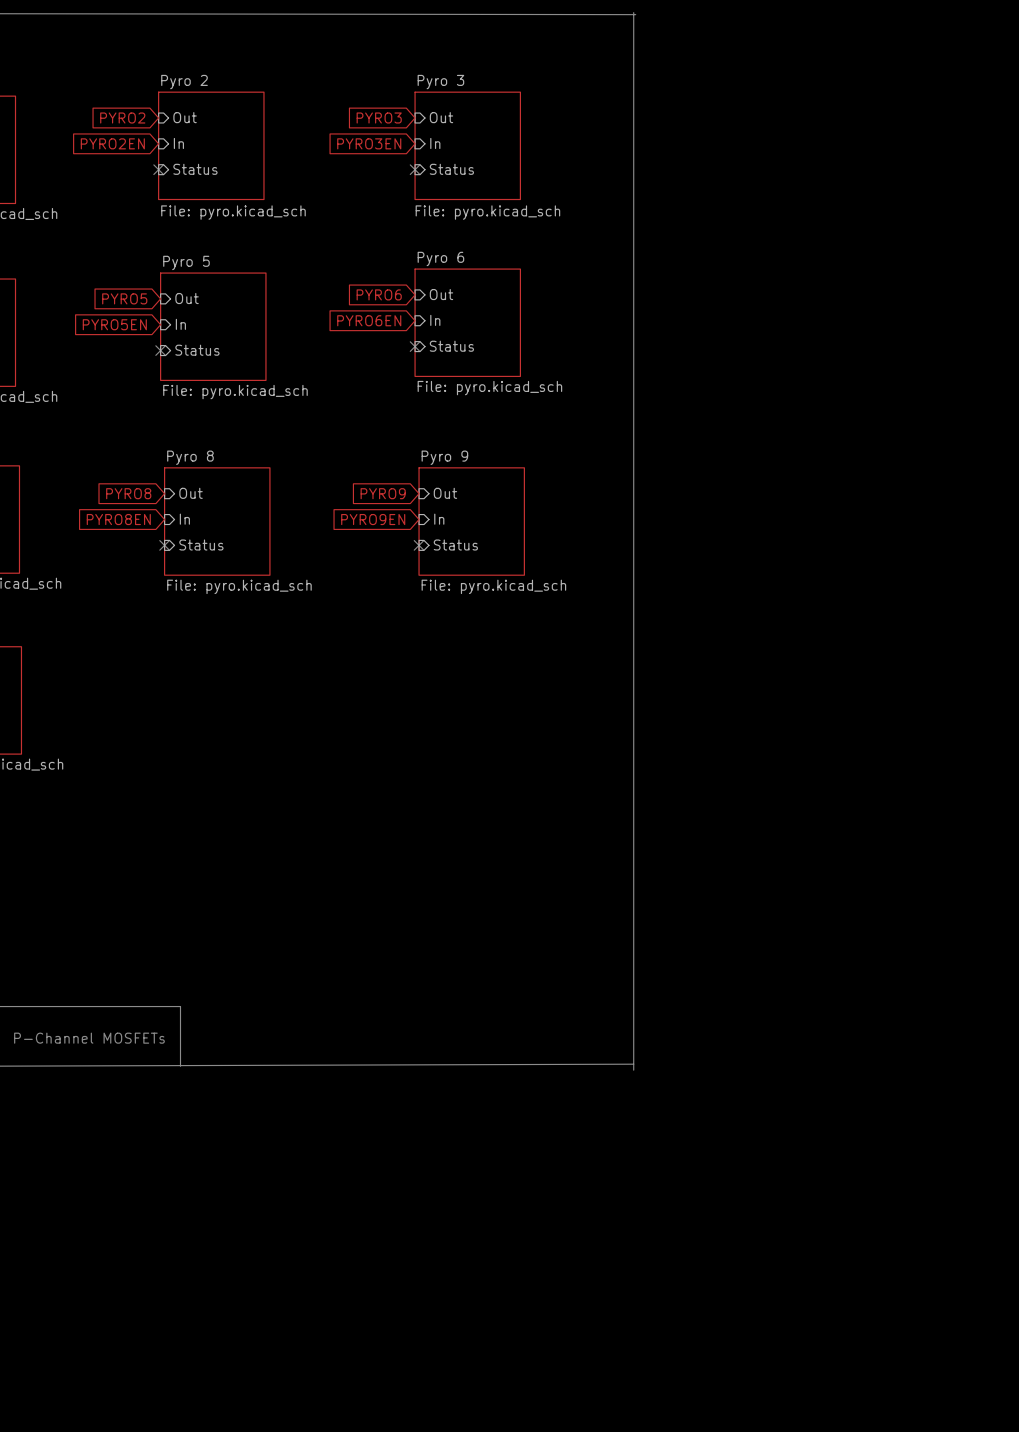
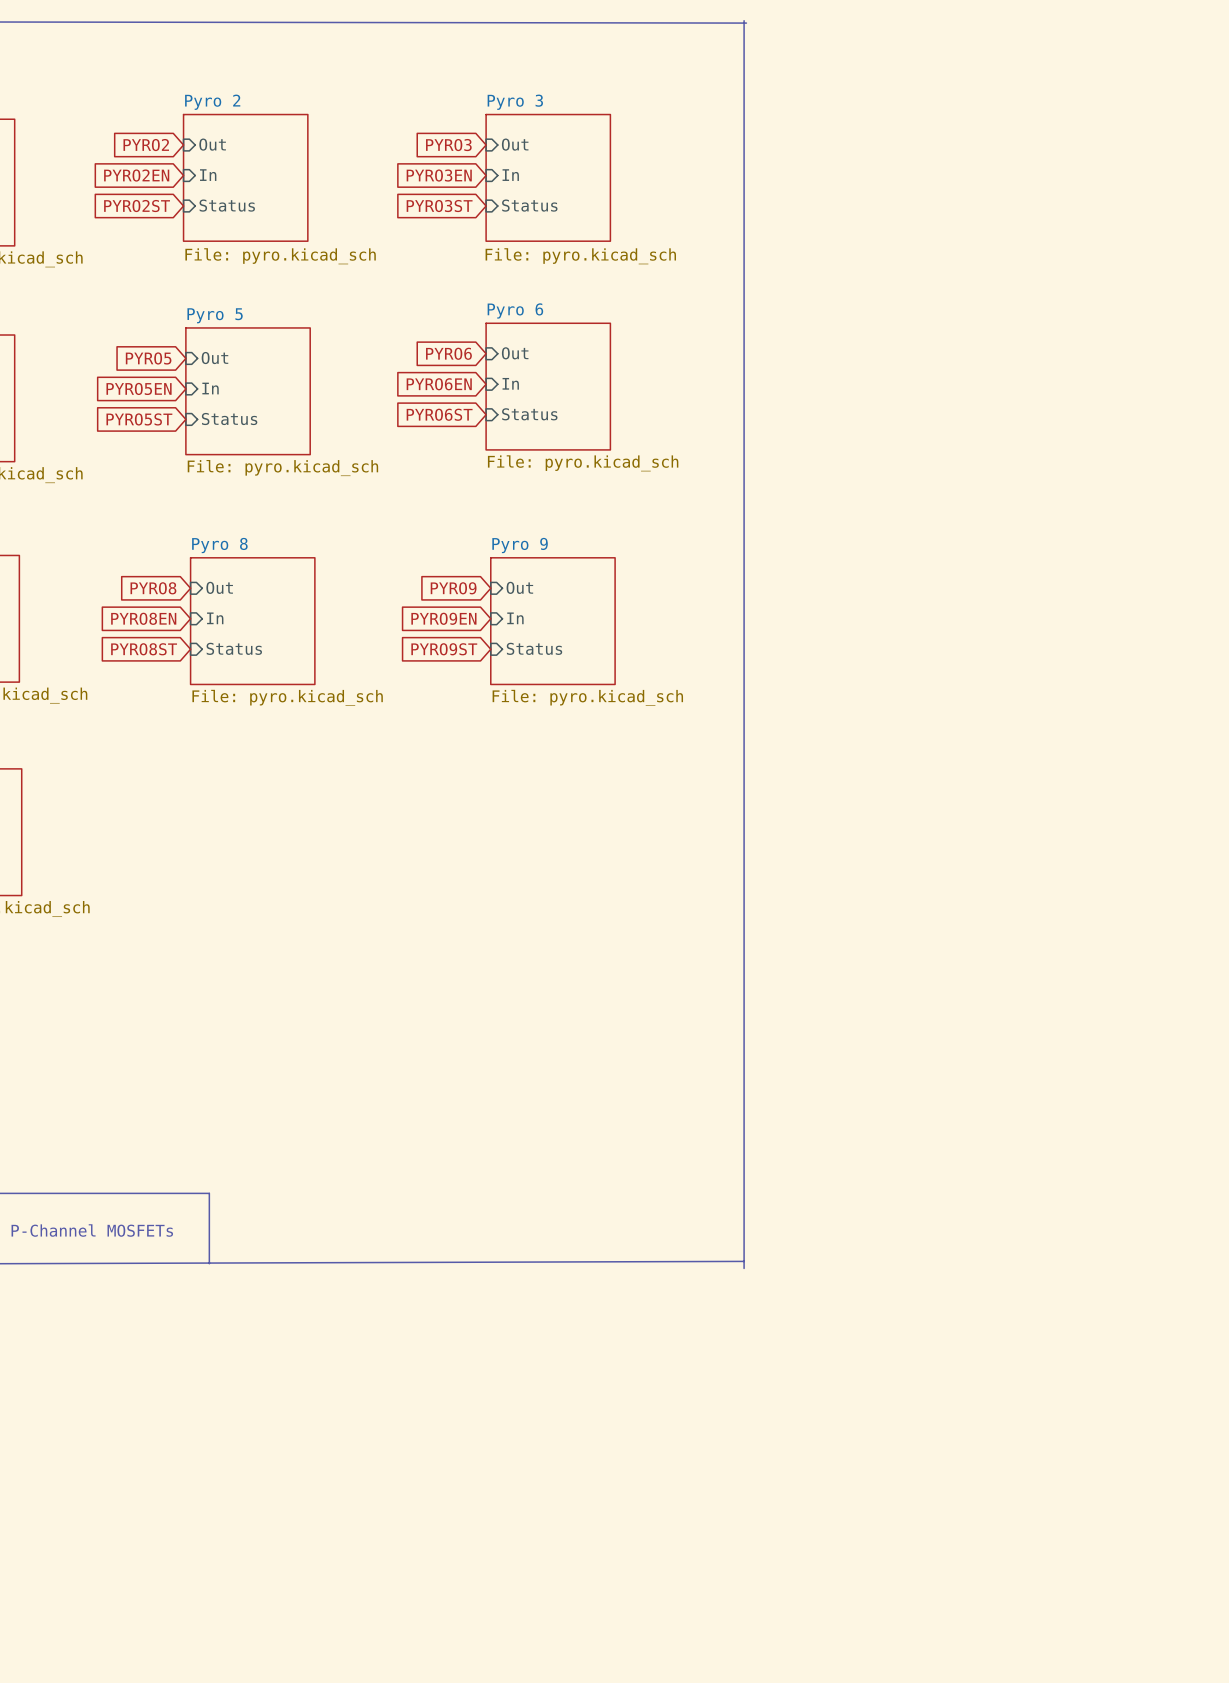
global label: none -> PYRO2ST (137, 206)
no-connect mark: (158, 169) -> none
global label: none -> PYRO3ST (439, 206)
no-connect mark: (415, 169) -> none
global label: none -> PYRO6ST (439, 414)
no-connect mark: (415, 346) -> none
global label: none -> PYRO5ST (139, 419)
no-connect mark: (160, 350) -> none
global label: none -> PYRO8ST (144, 649)
no-connect mark: (164, 545) -> none
global label: none -> PYRO9ST (444, 649)
no-connect mark: (419, 545) -> none

